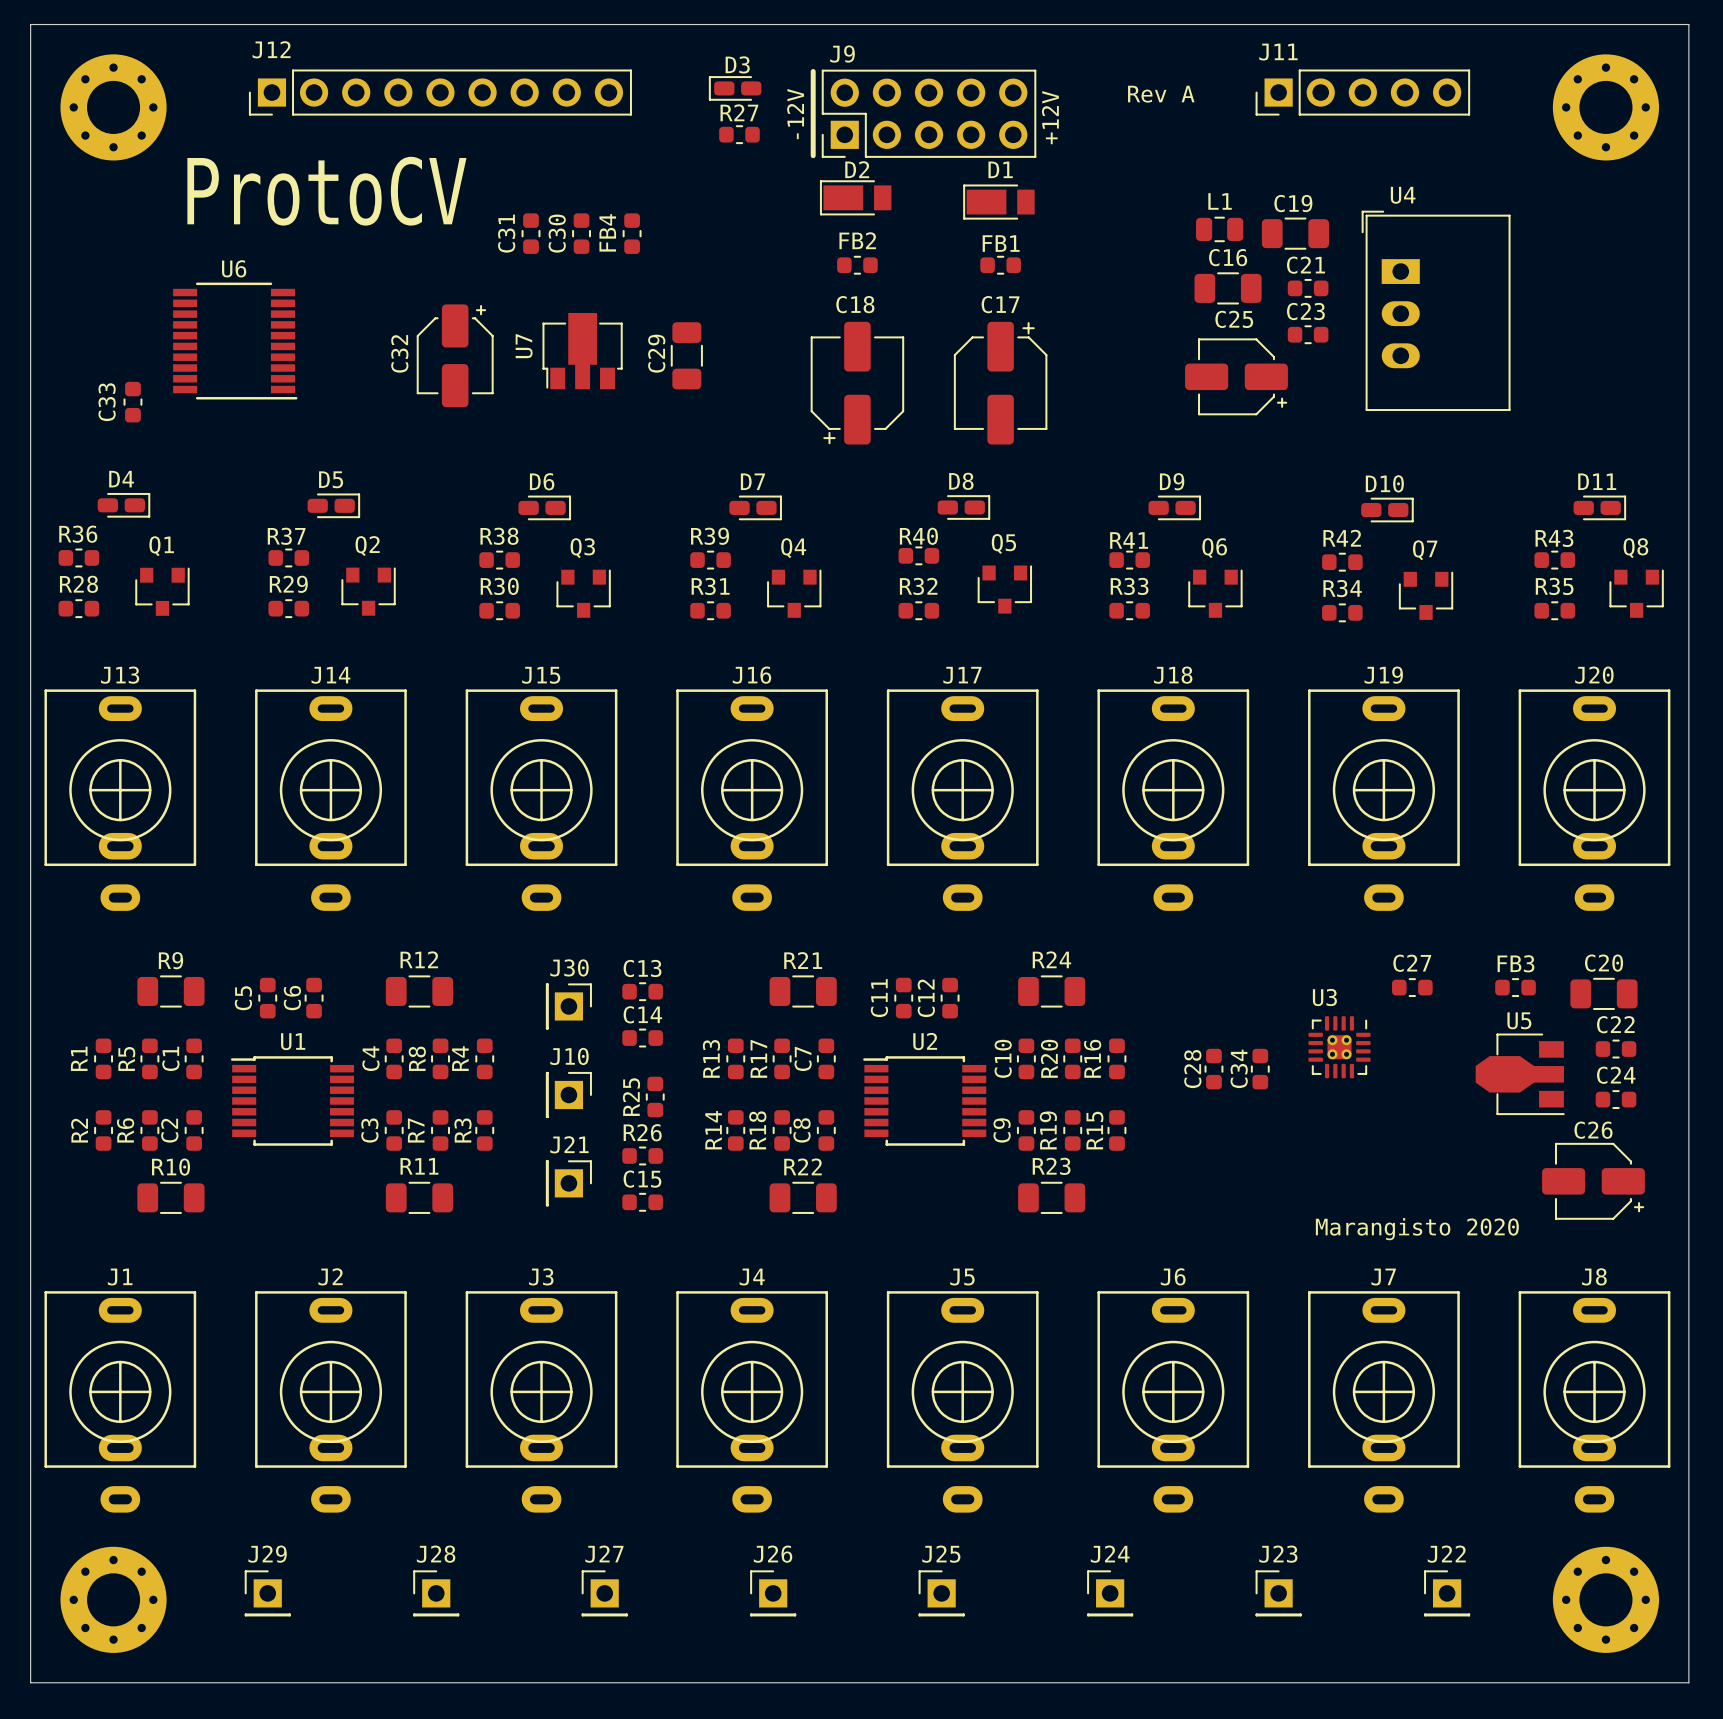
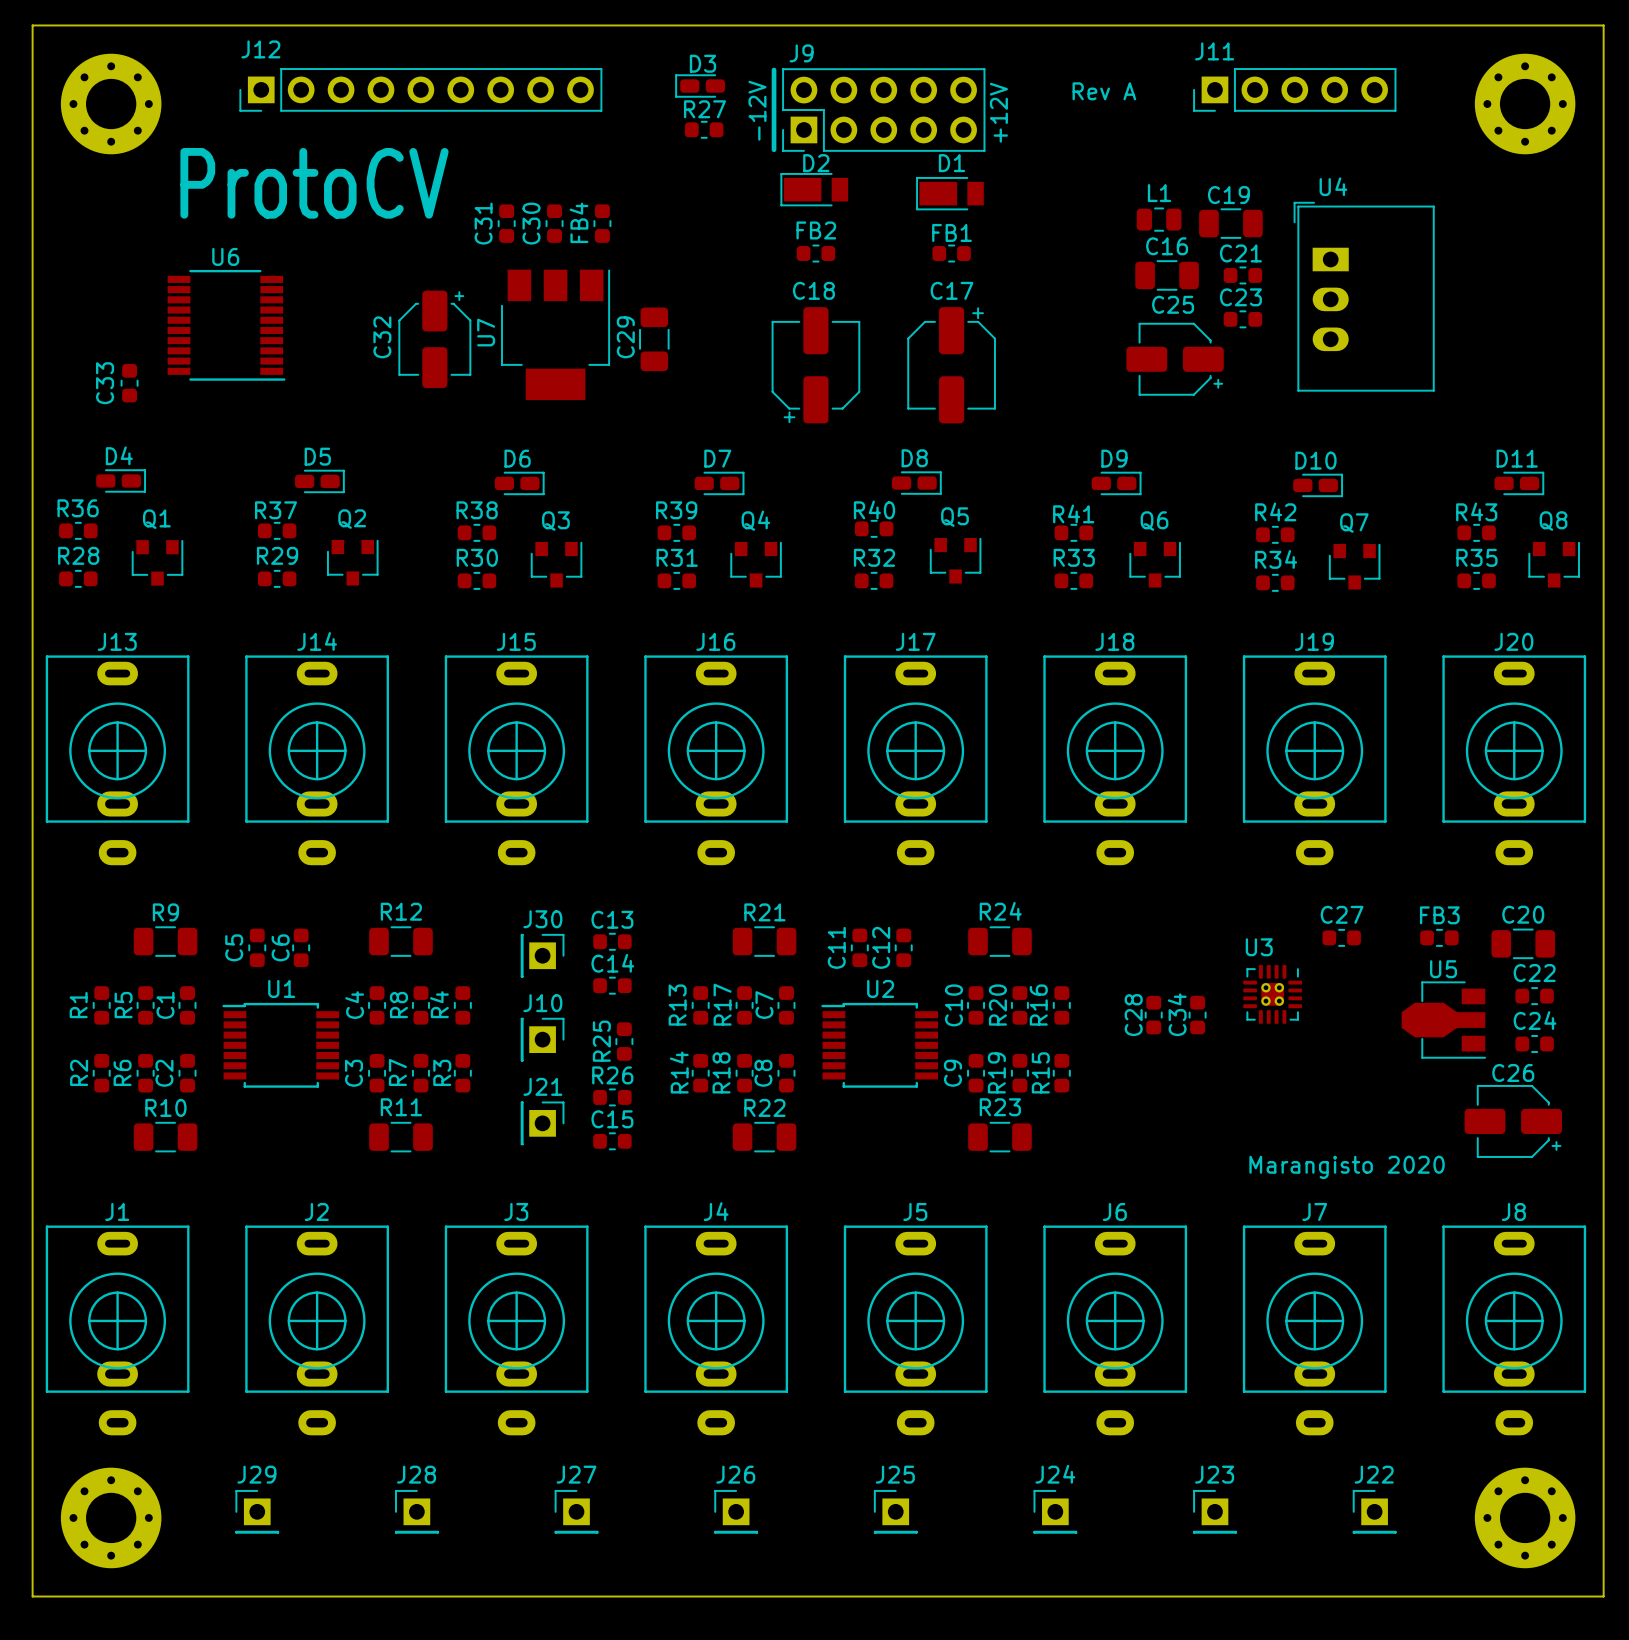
U7 footprint: [542, 312, 623, 390] -> [501, 269, 611, 401]

